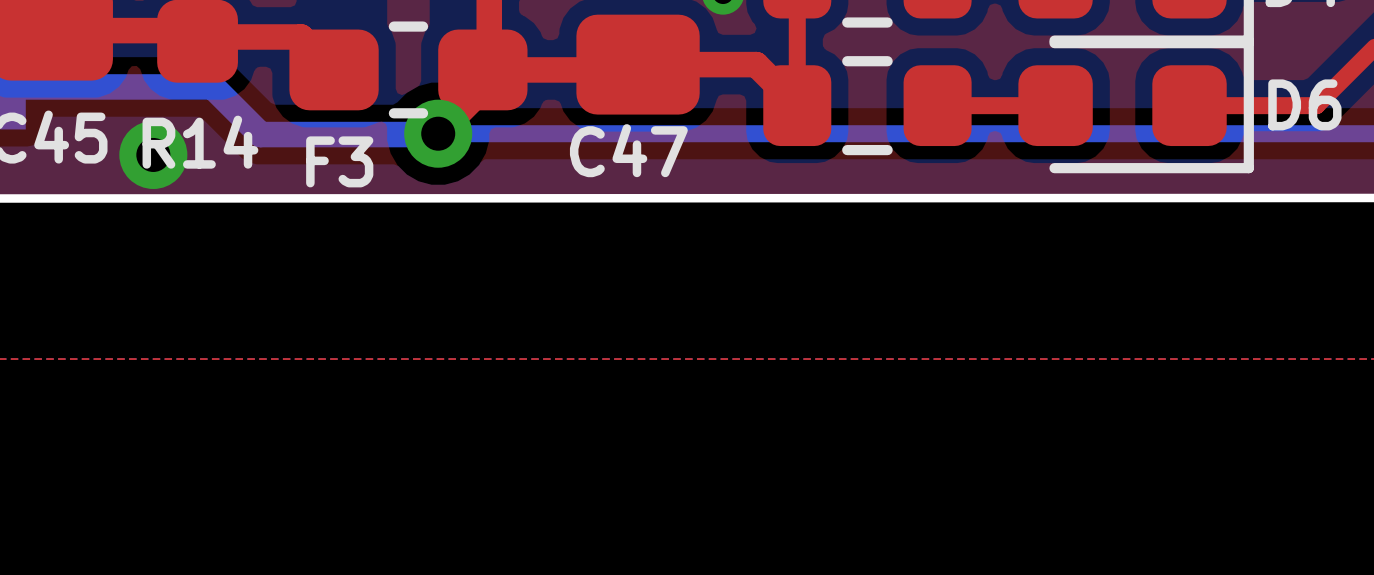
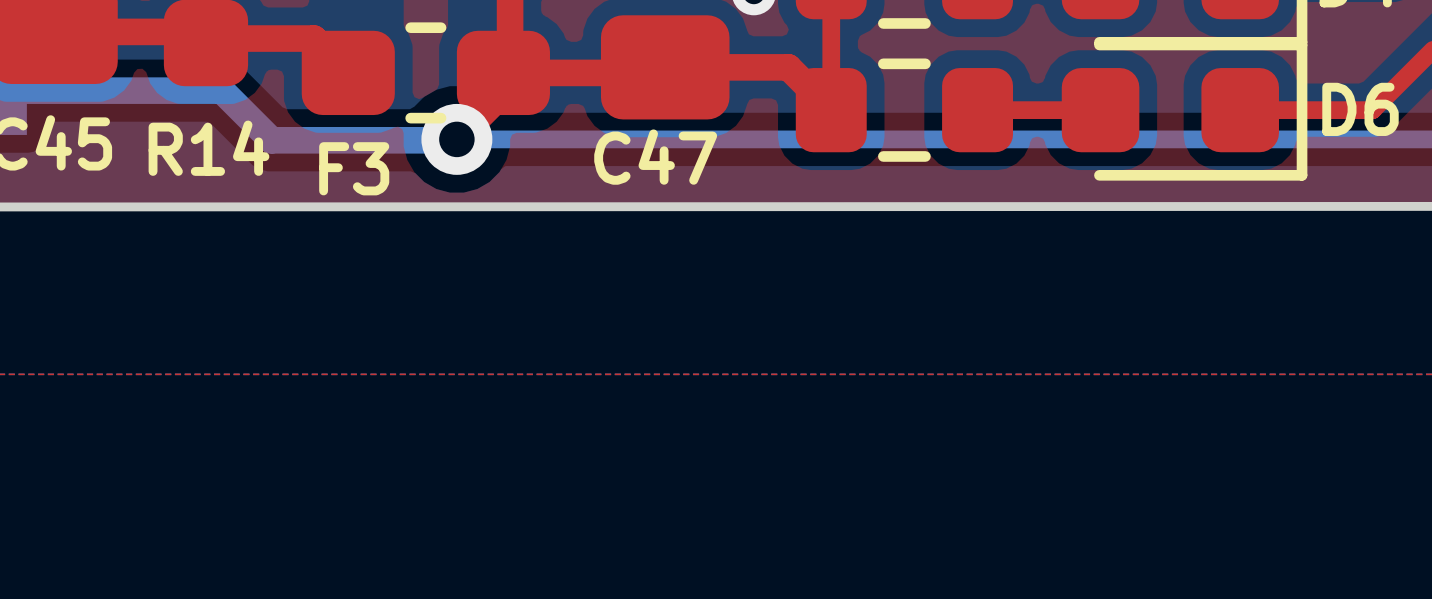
via: (153, 154) -> none

